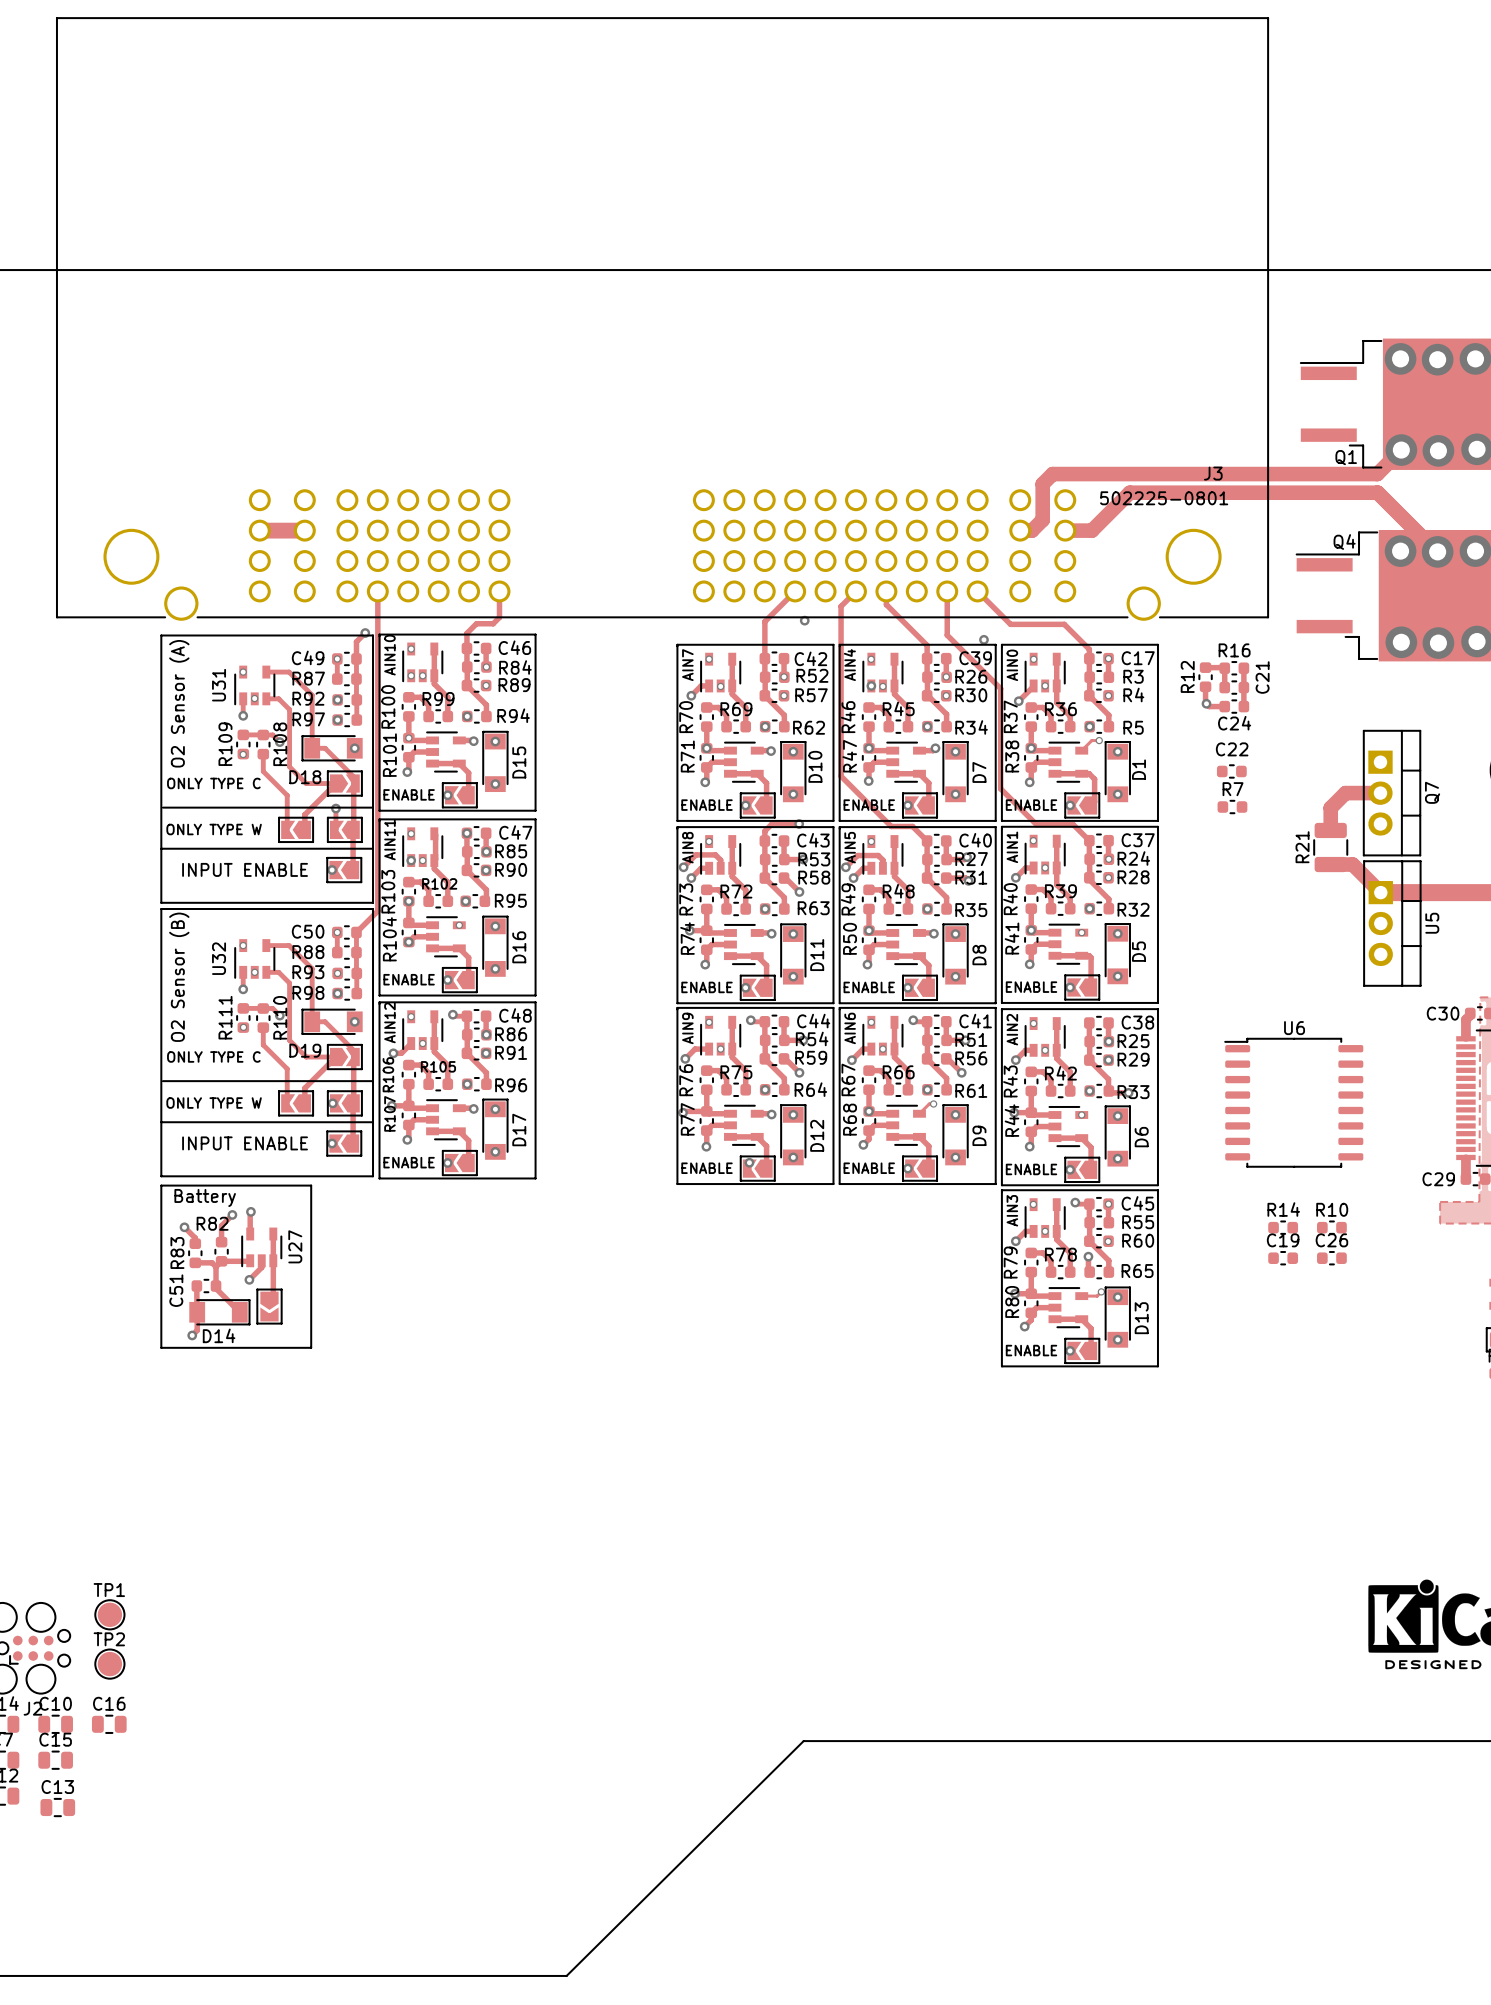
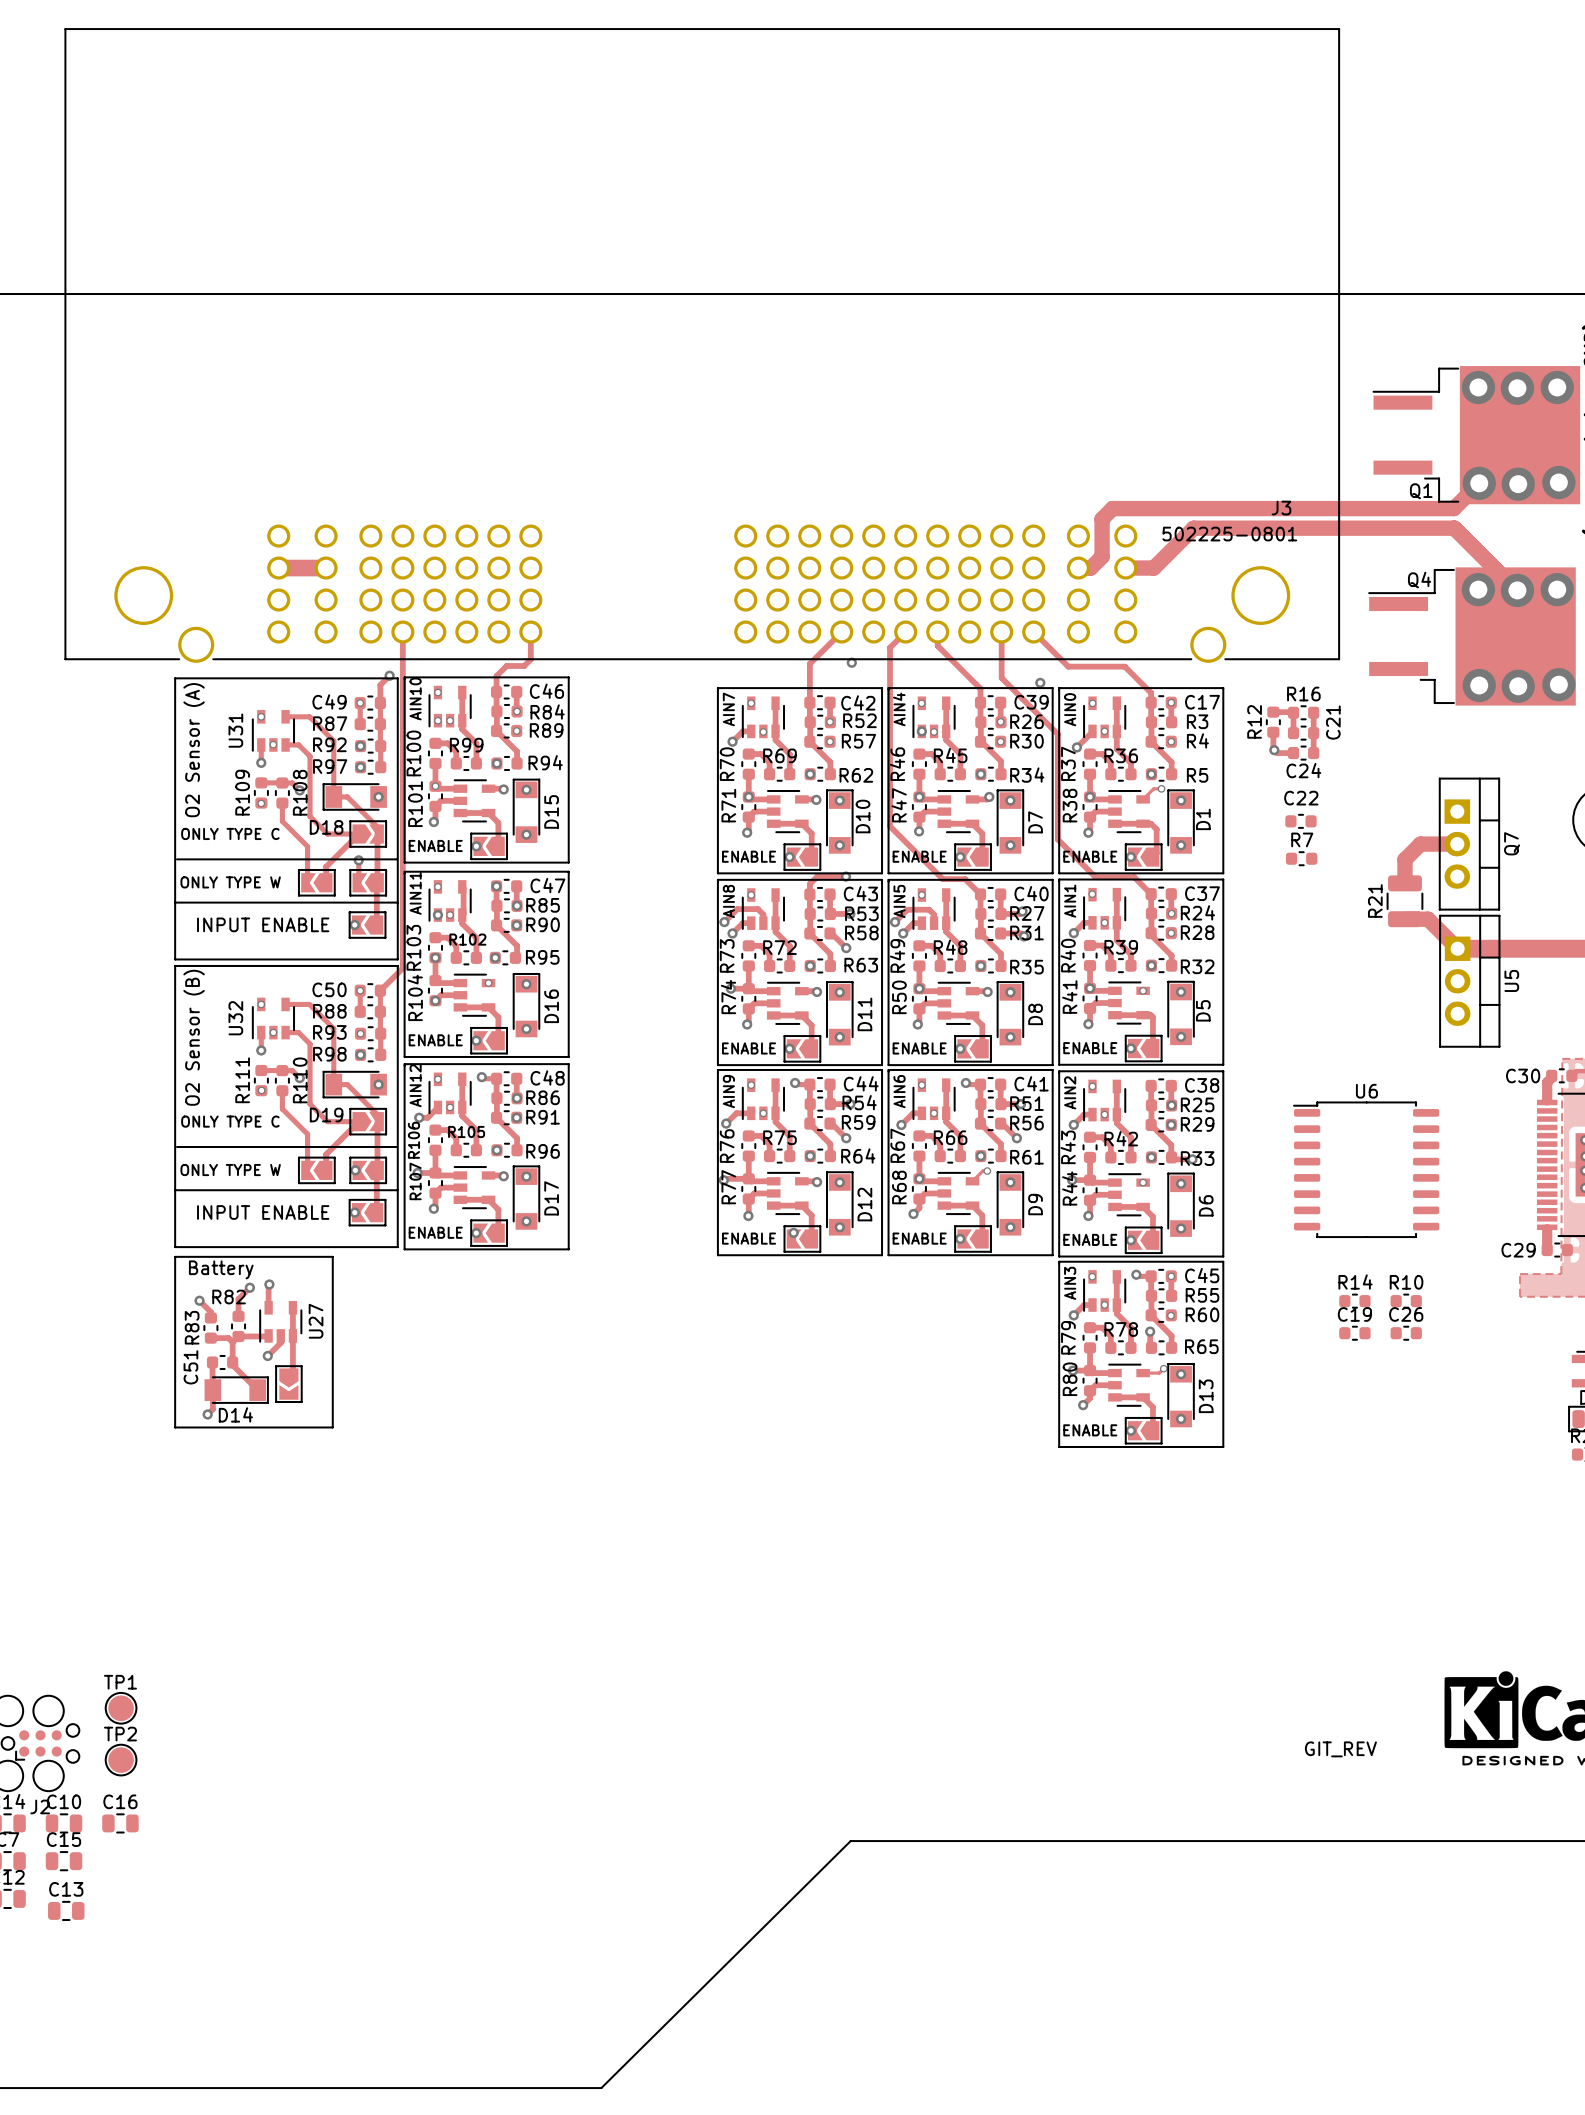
text: none -> GIT_REV (1340, 1749)

